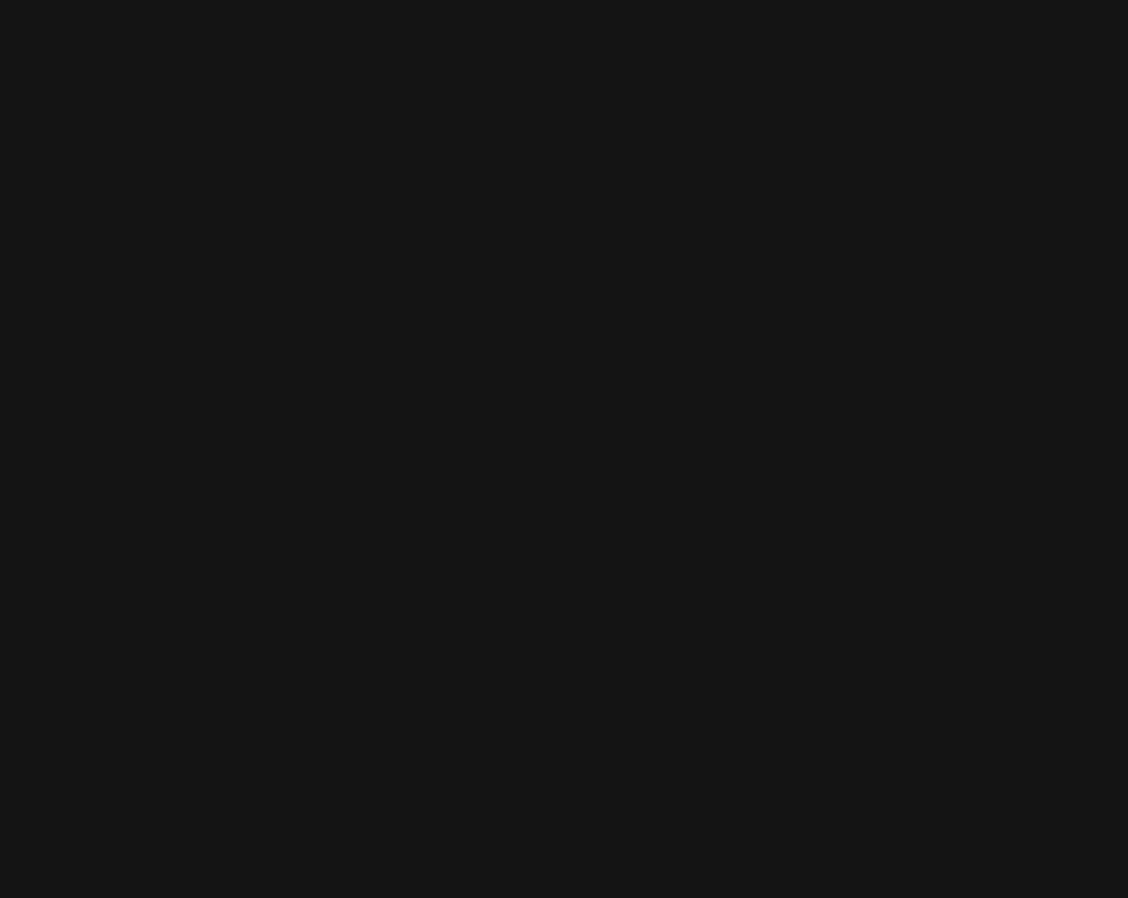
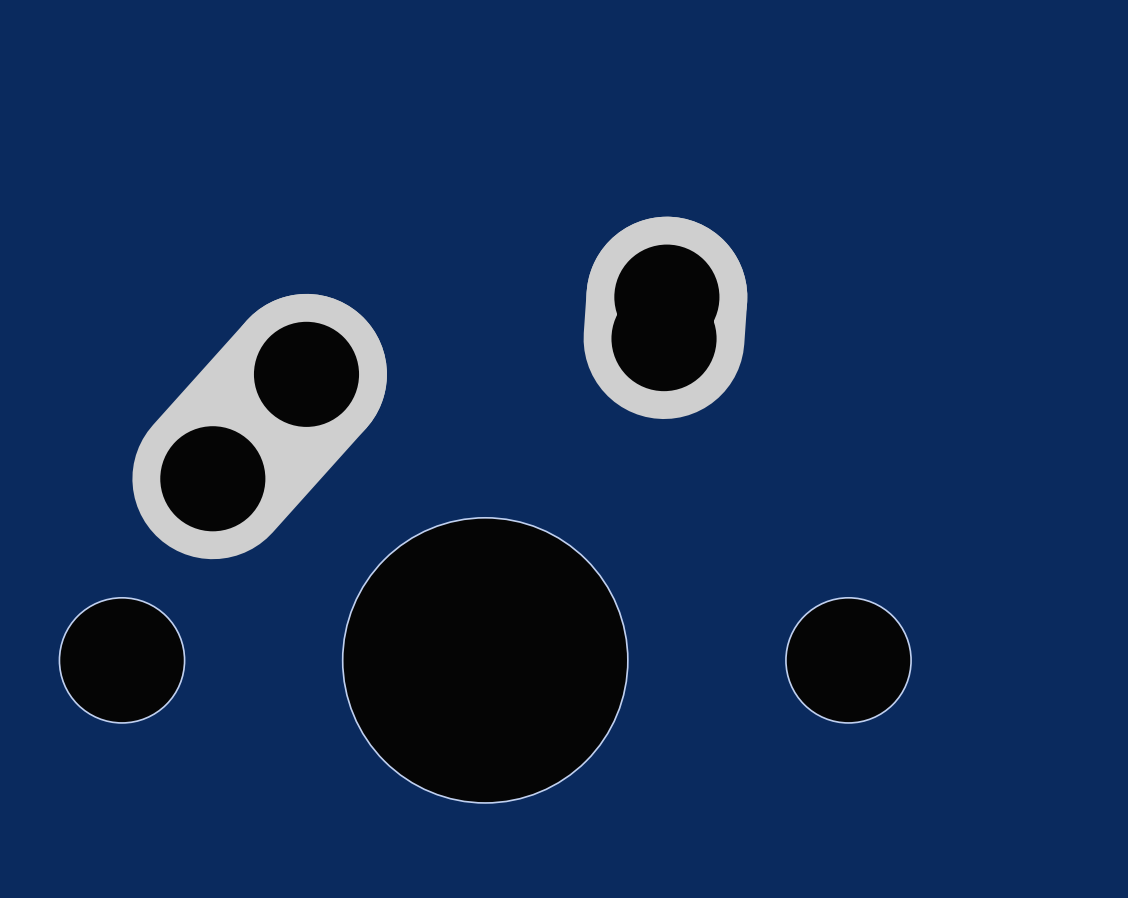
part: none -> (485, 509)

